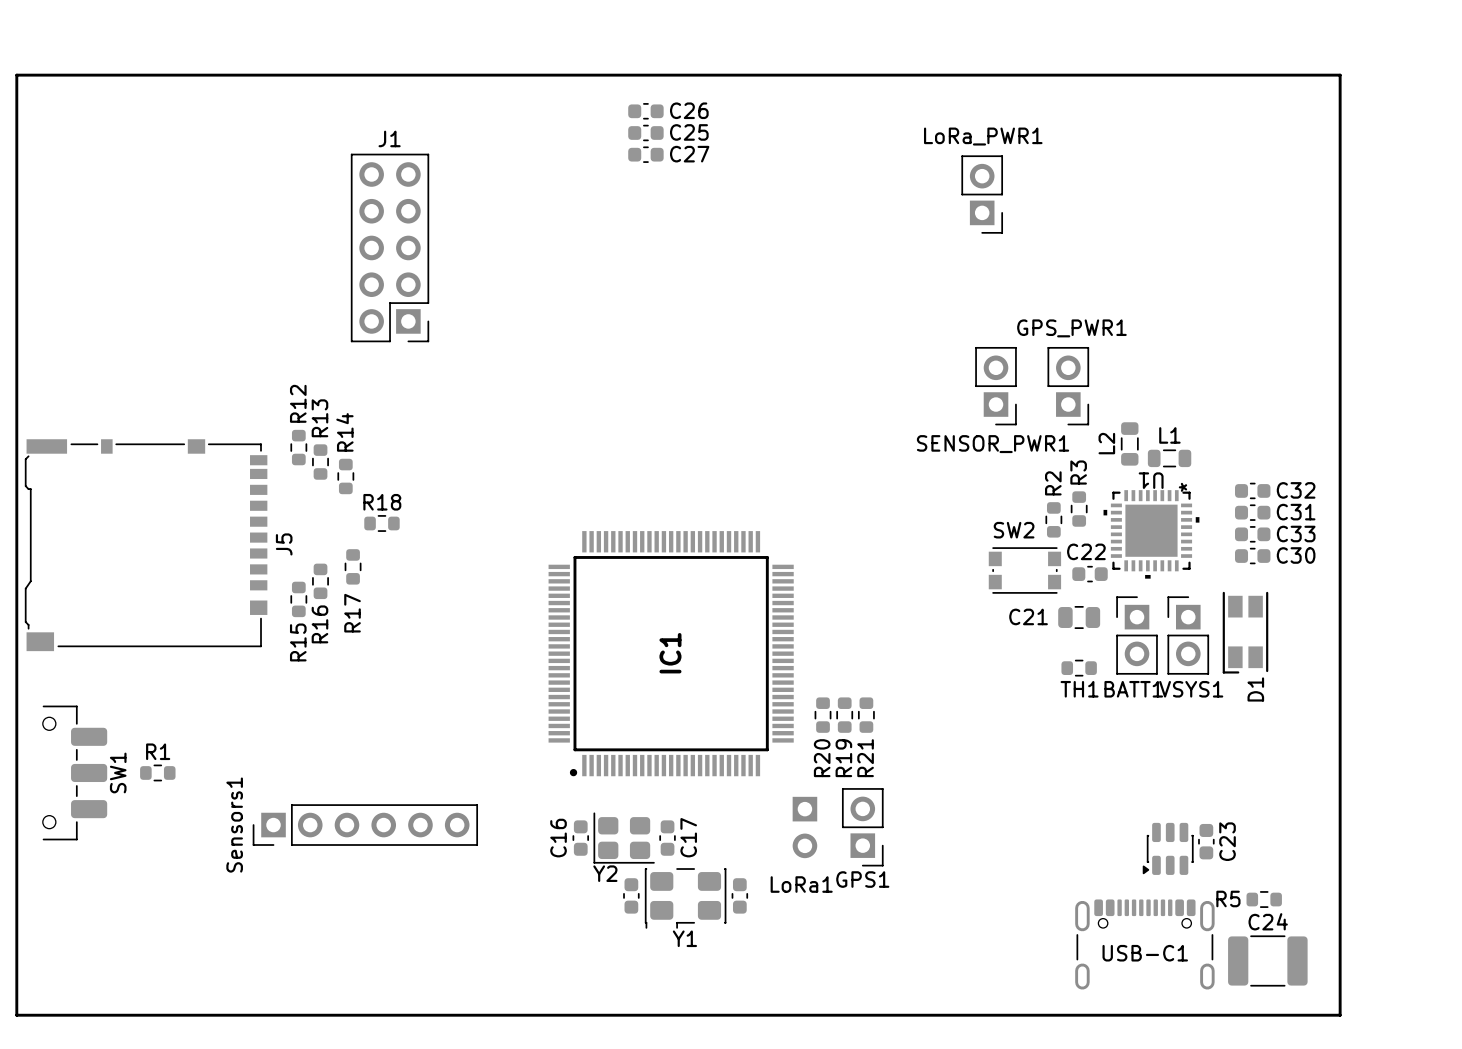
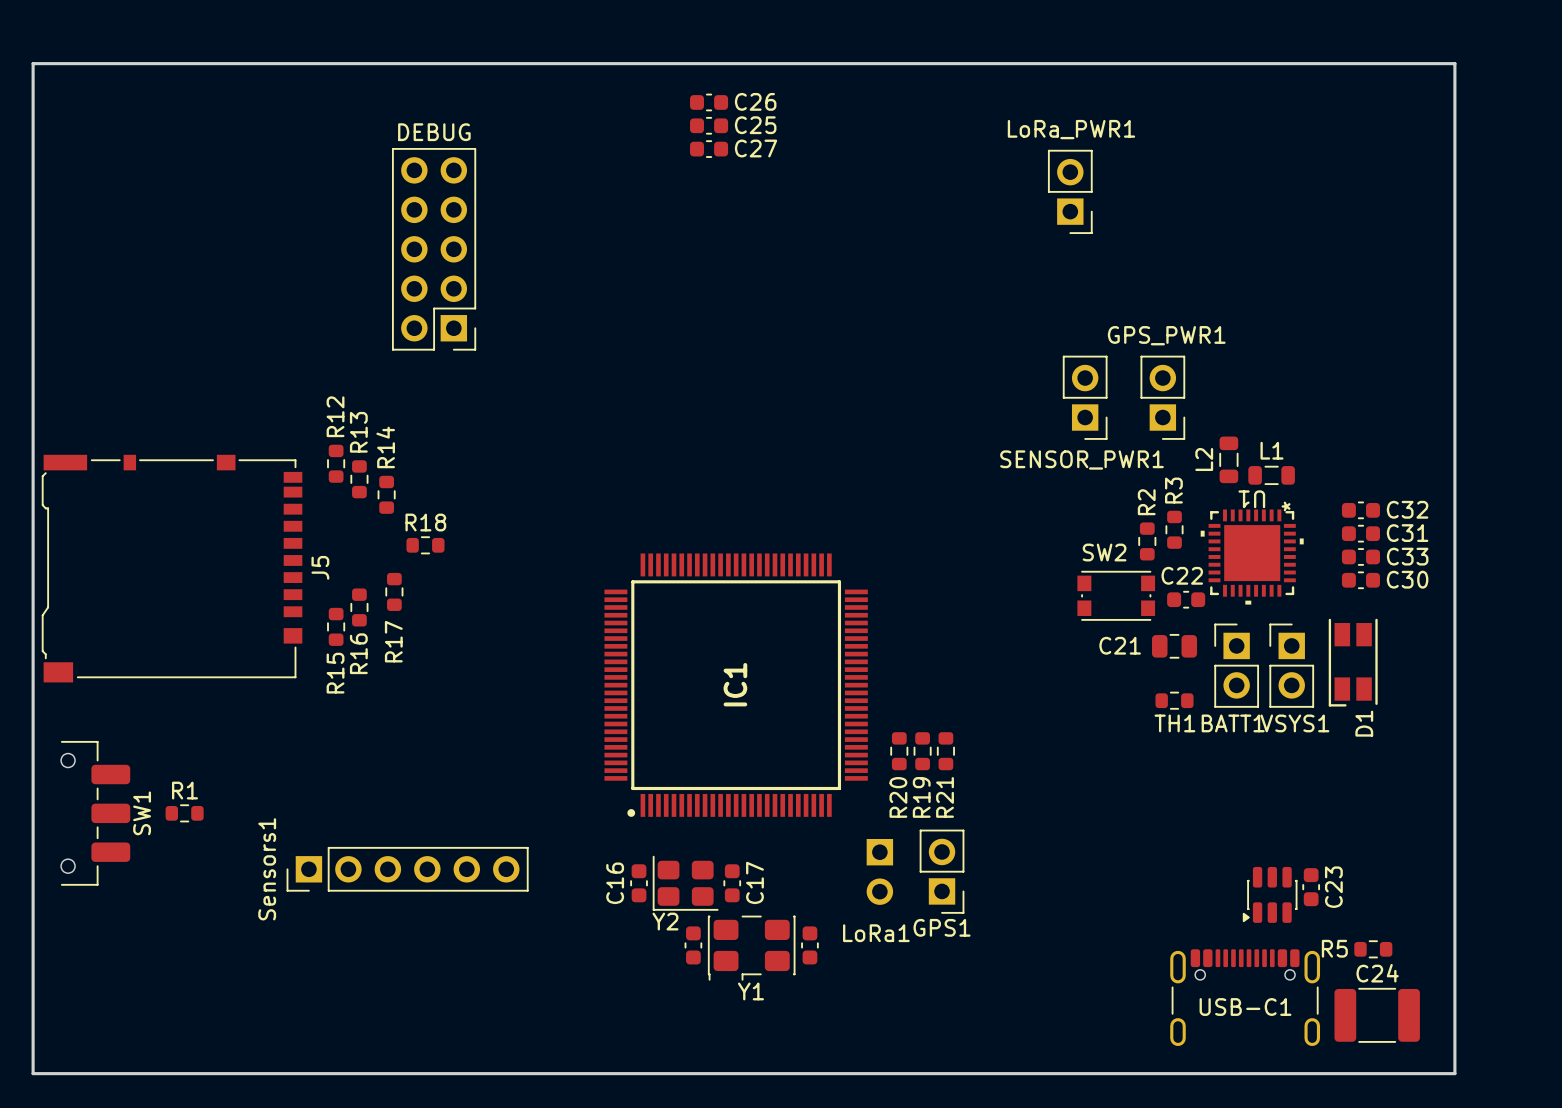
J1 name: J1 (389, 138) -> DEBUG (434, 132)

